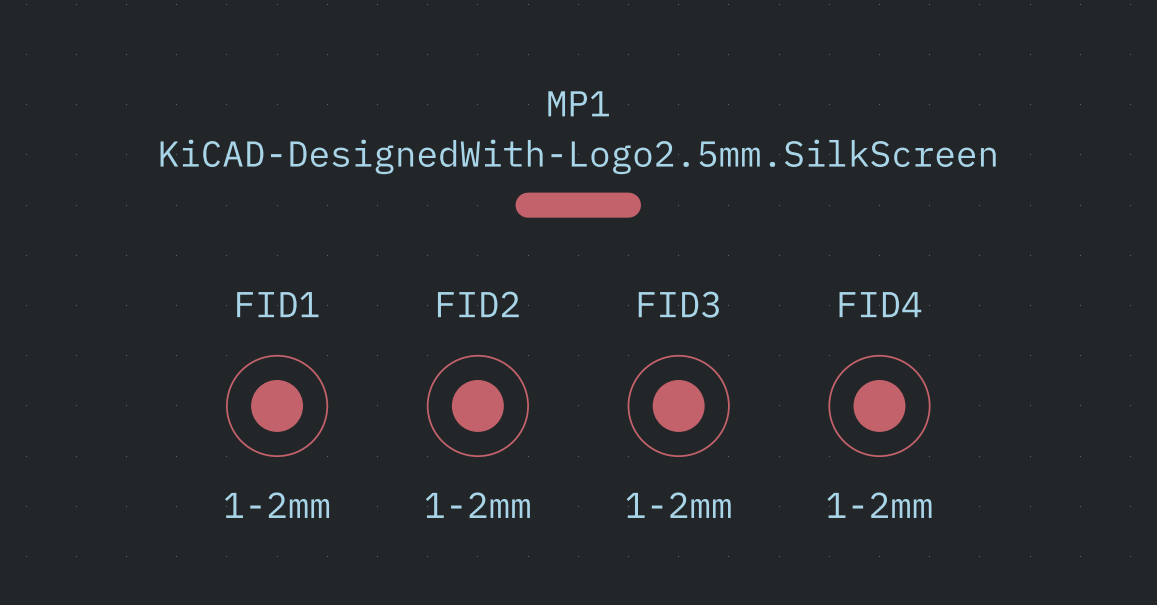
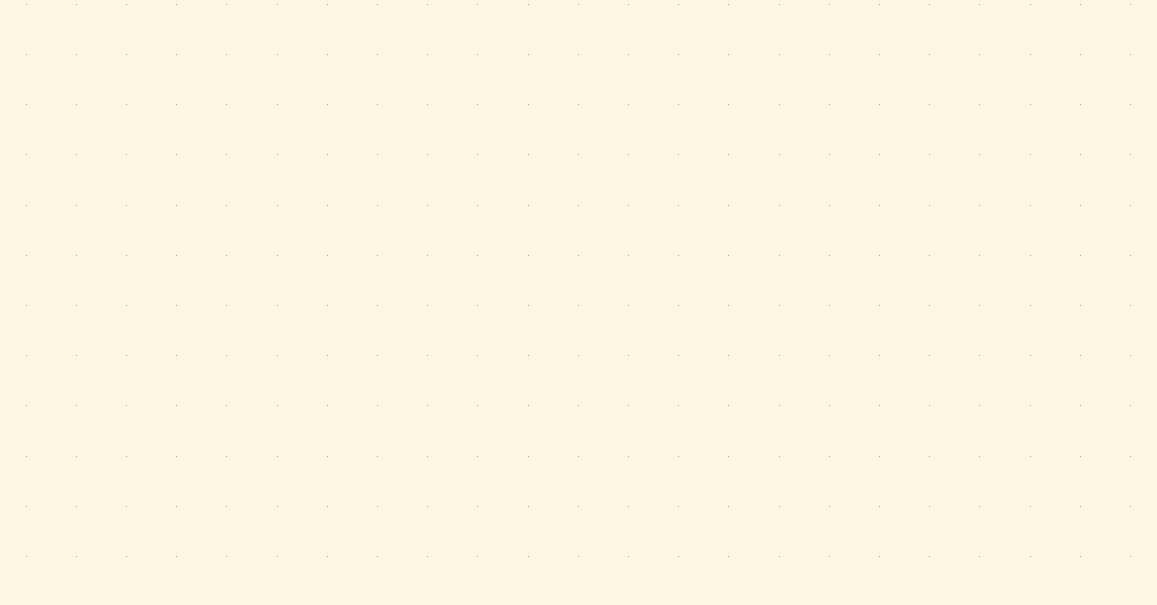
MP1: KiCAD-DesignedWith-Logo2.5mm.SilkScreen (578, 205) -> none
FID1: 1-2mm (277, 405) -> none
FID2: 1-2mm (477, 405) -> none
FID3: 1-2mm (678, 405) -> none
FID4: 1-2mm (879, 405) -> none

